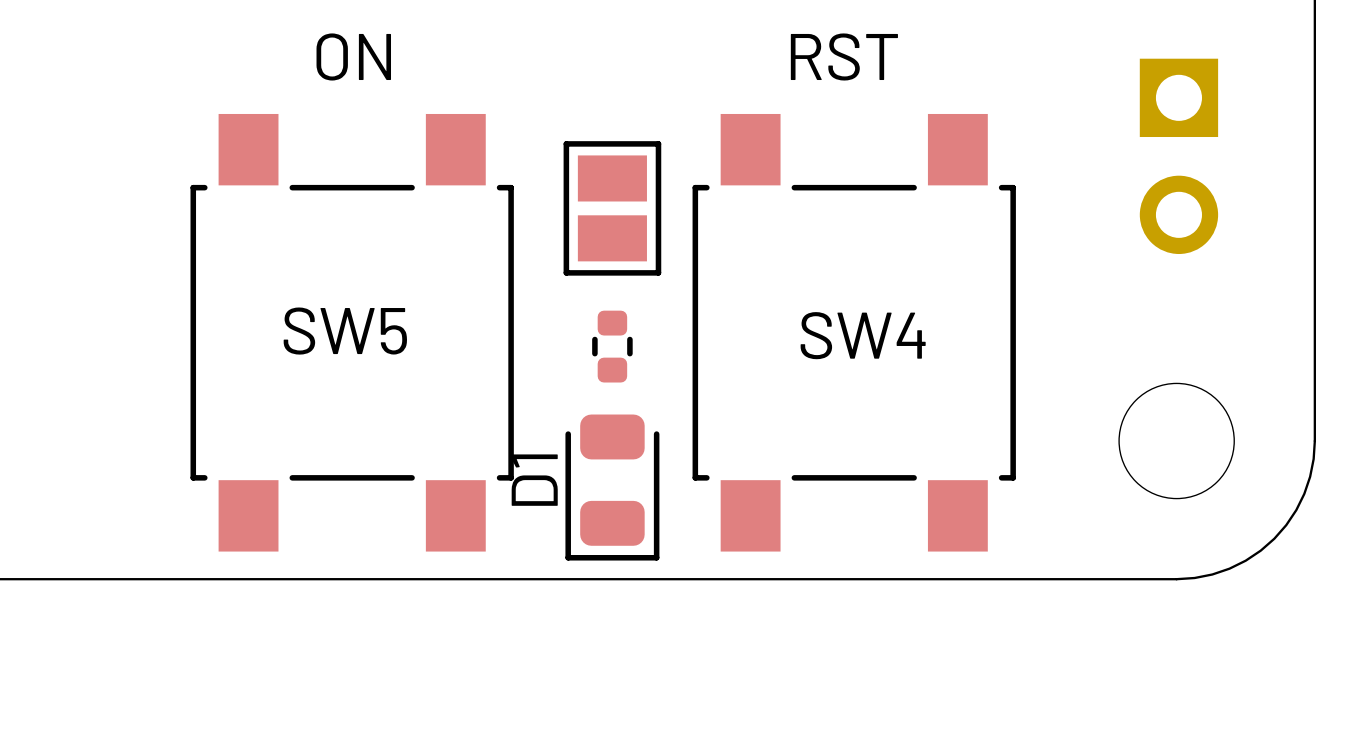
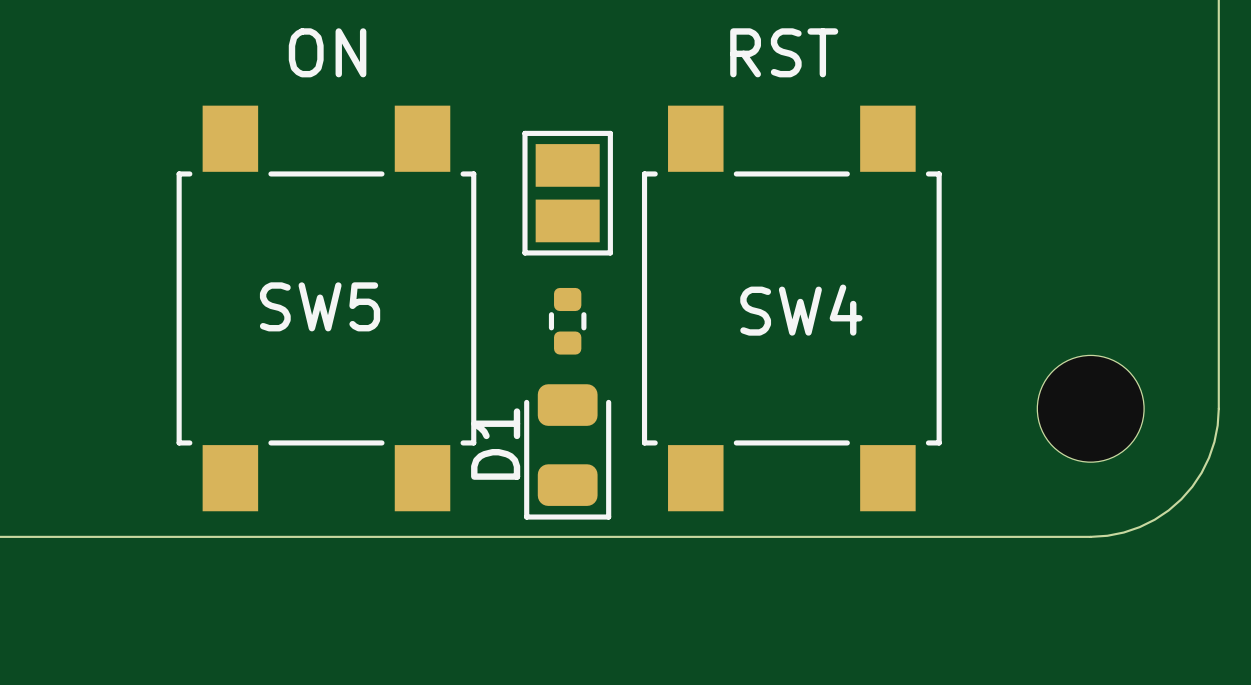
part: (1178, 156) -> none

